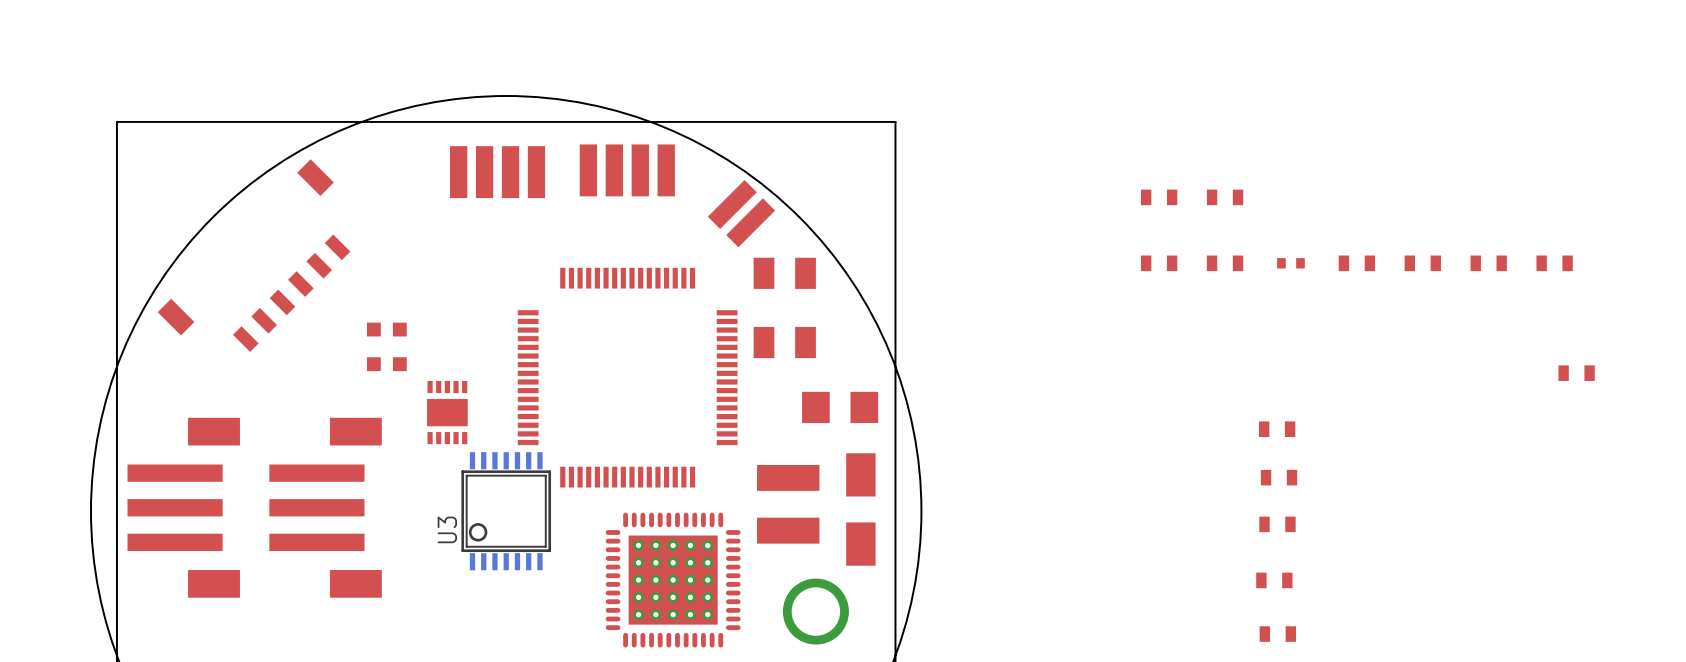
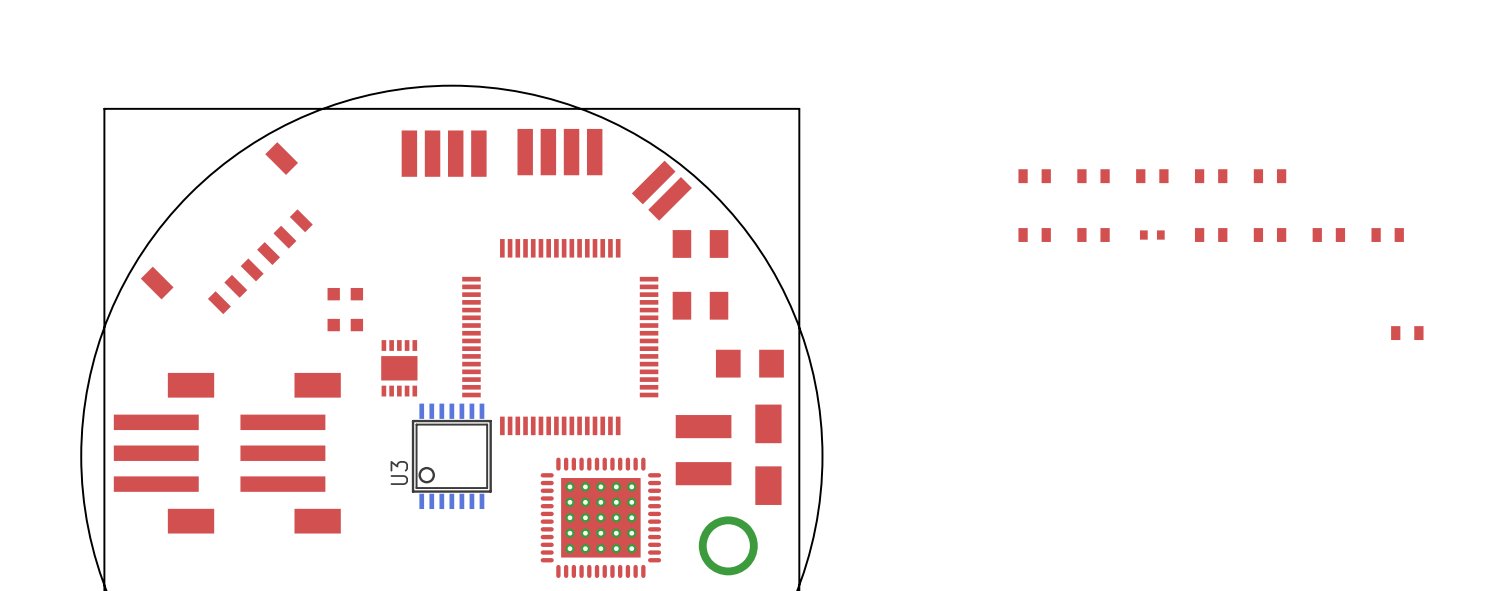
part: none -> (1152, 176)
part: none -> (1211, 176)
part: none -> (1270, 176)
part: (1277, 429) -> none
part: (1279, 477) -> none
part: (1277, 524) -> none
part: (1274, 580) -> none
part: (1277, 634) -> none

